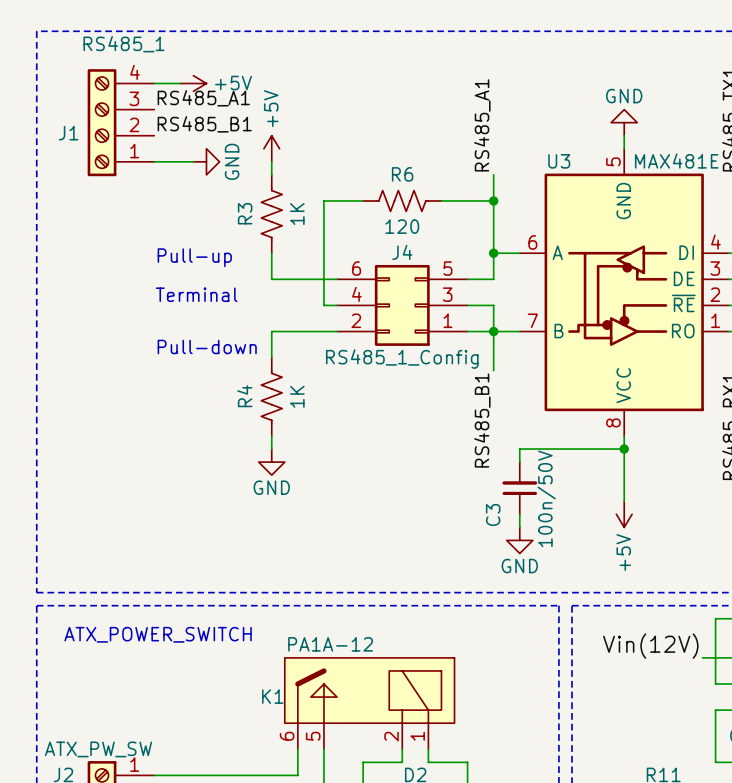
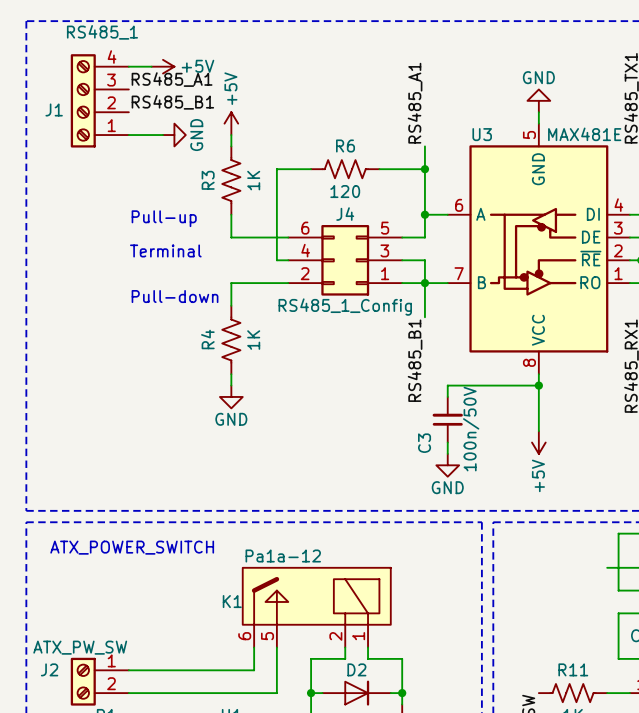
K1 value: PA1A-12 (330, 644) -> Pa1a-12 (283, 556)
label: Vin(12V) (650, 646) -> none

